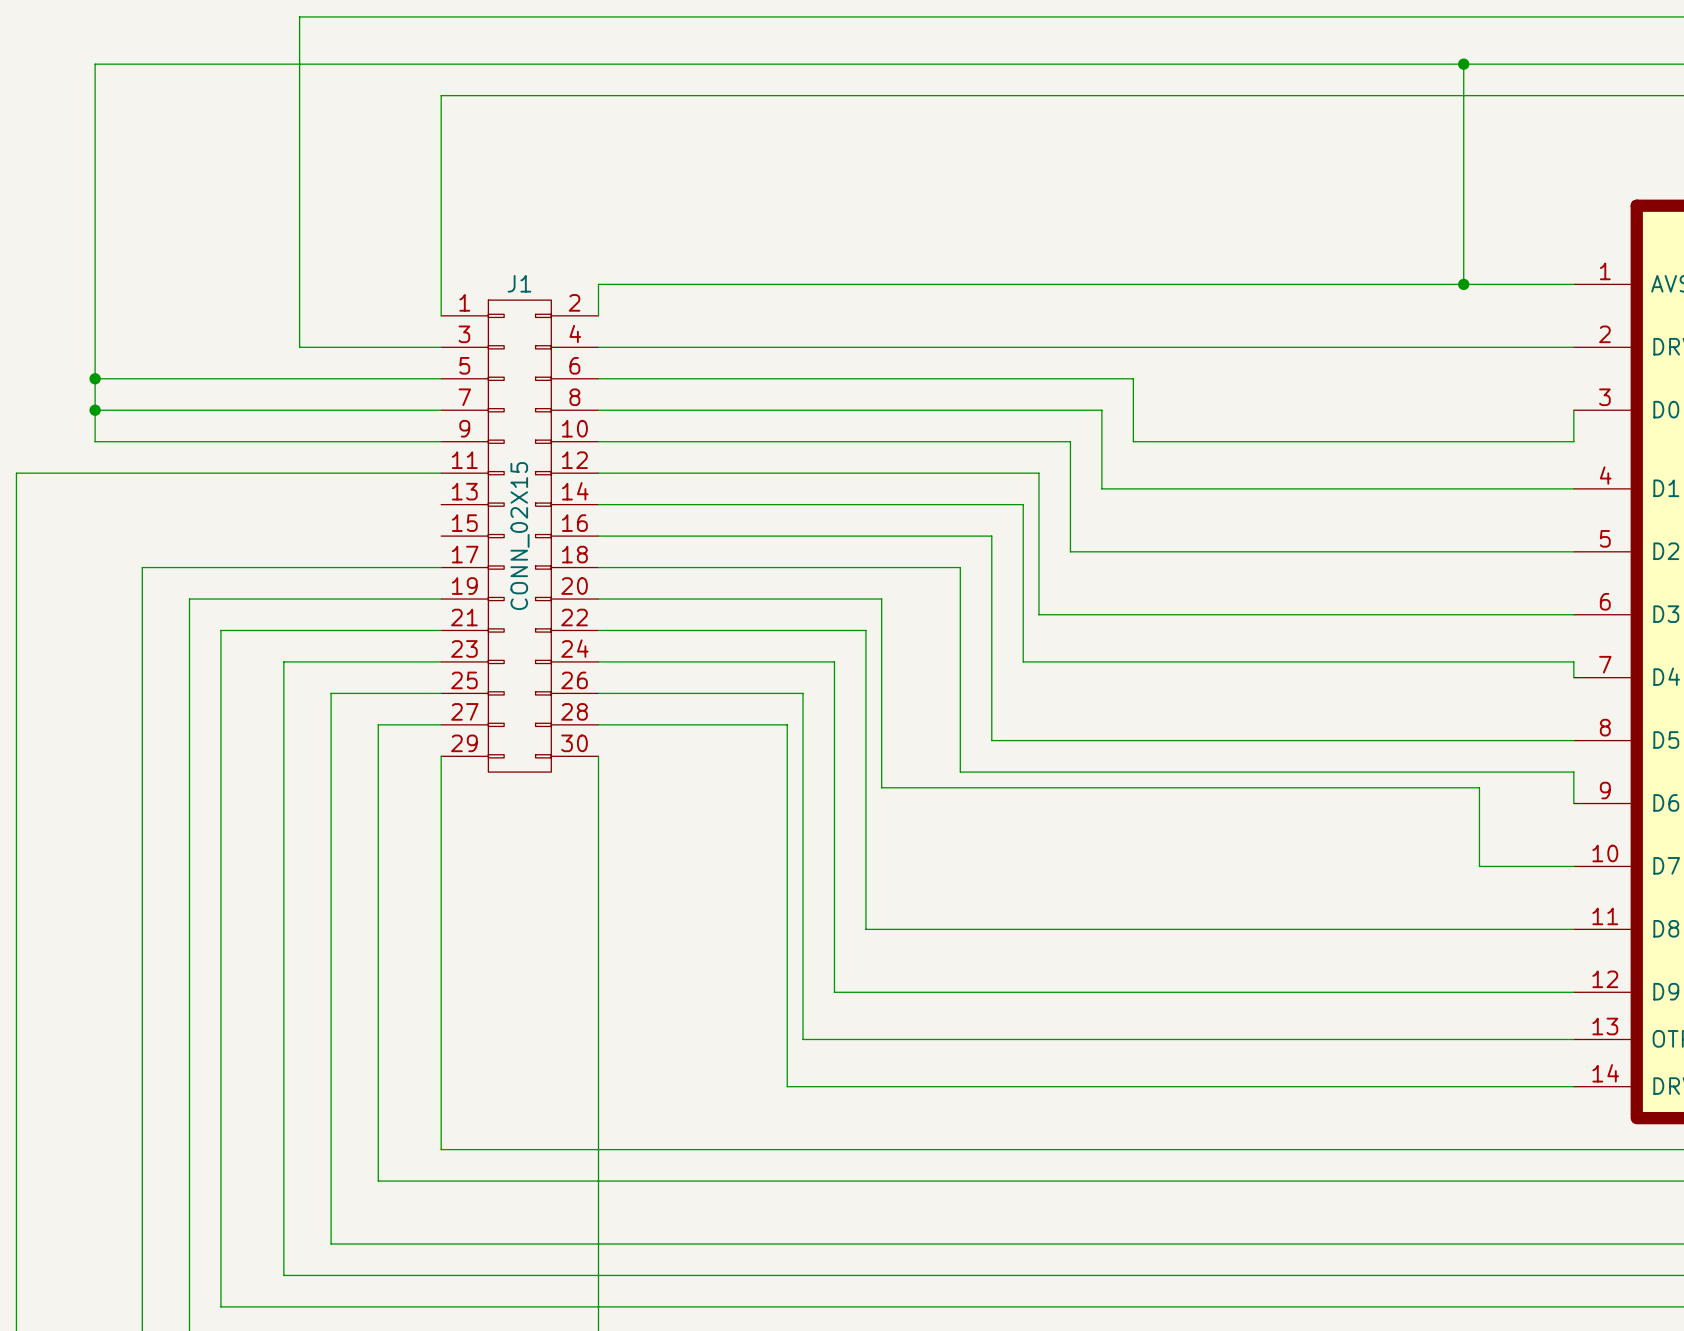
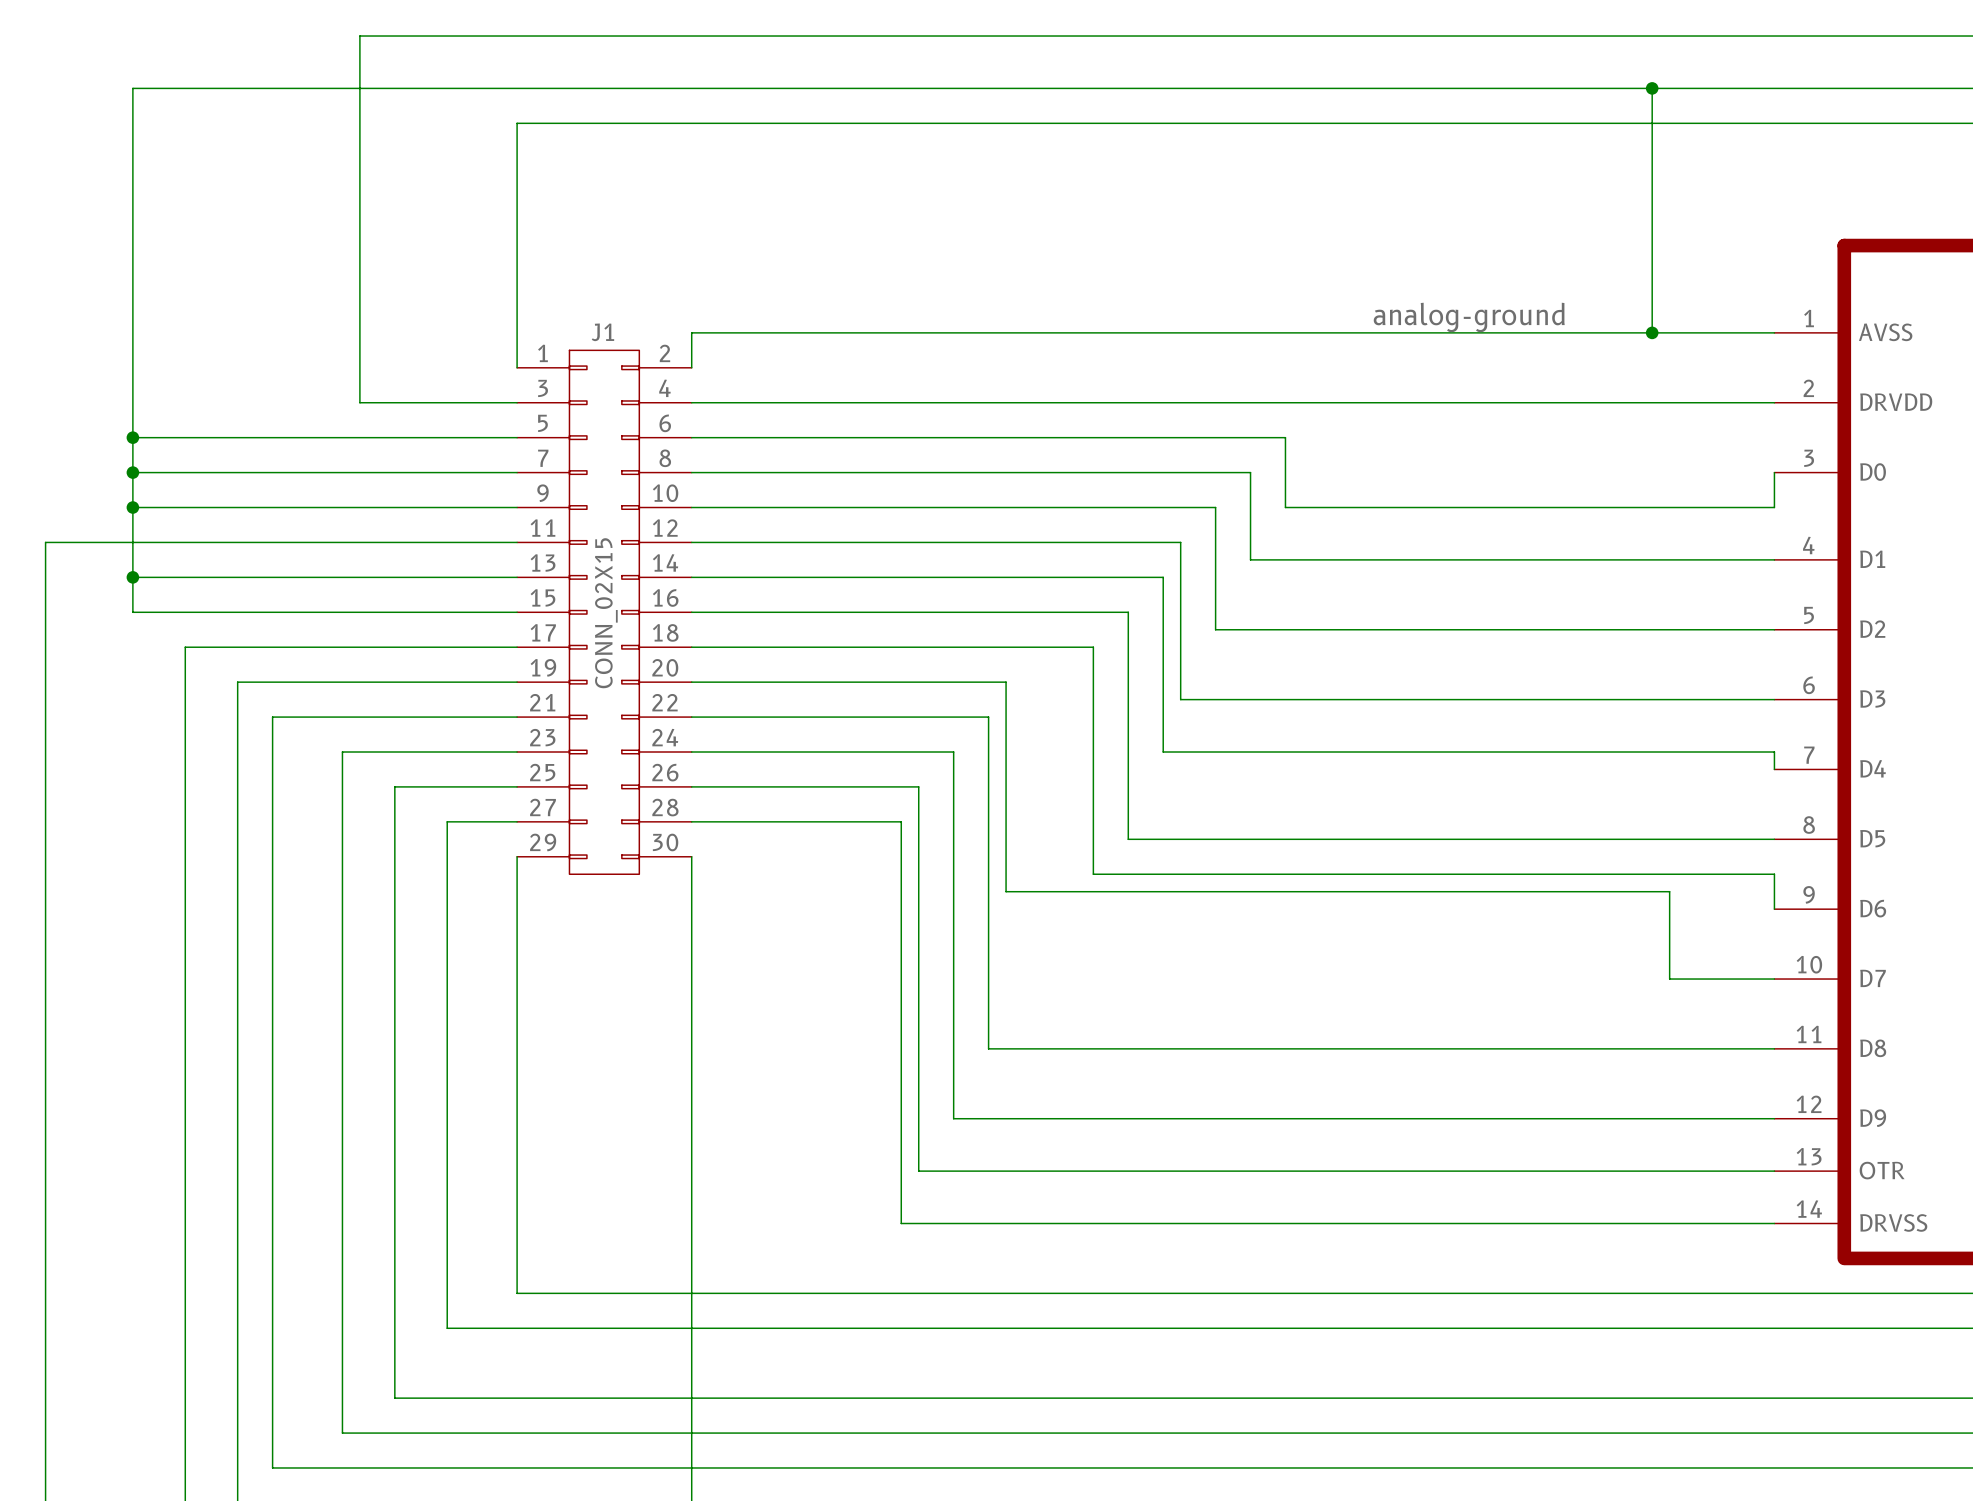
label: none -> analog-ground (1469, 317)
wire: none -> (132, 507) (132, 612) (517, 612)
junction: none -> (132, 507)
wire: none -> (132, 577) (517, 577)
junction: none -> (132, 577)

